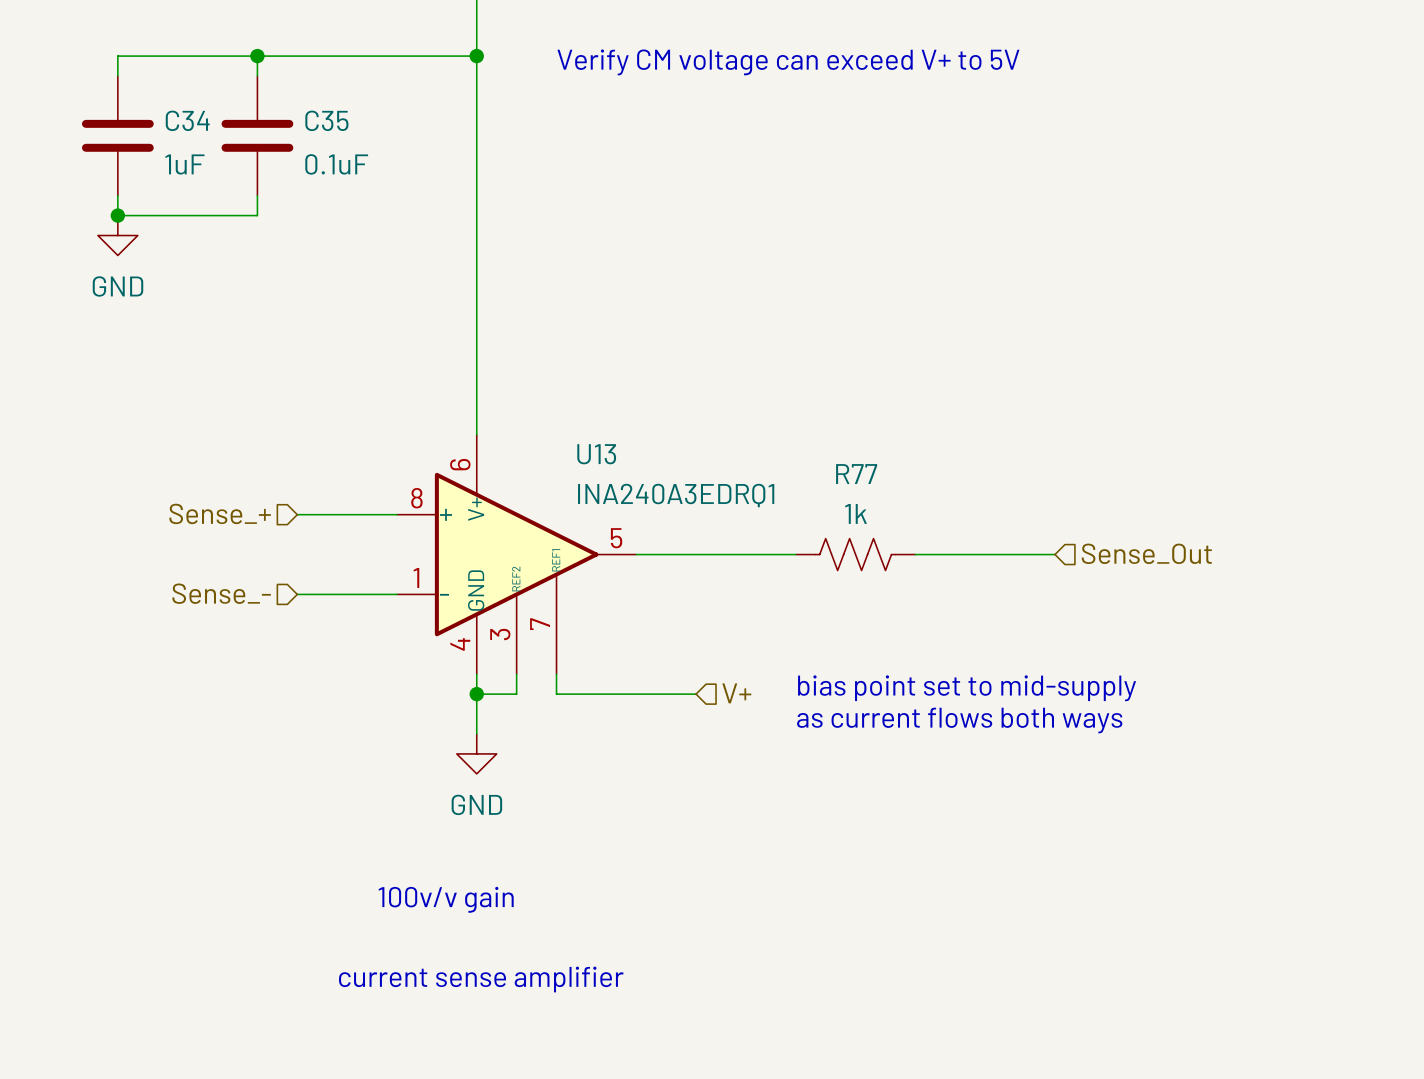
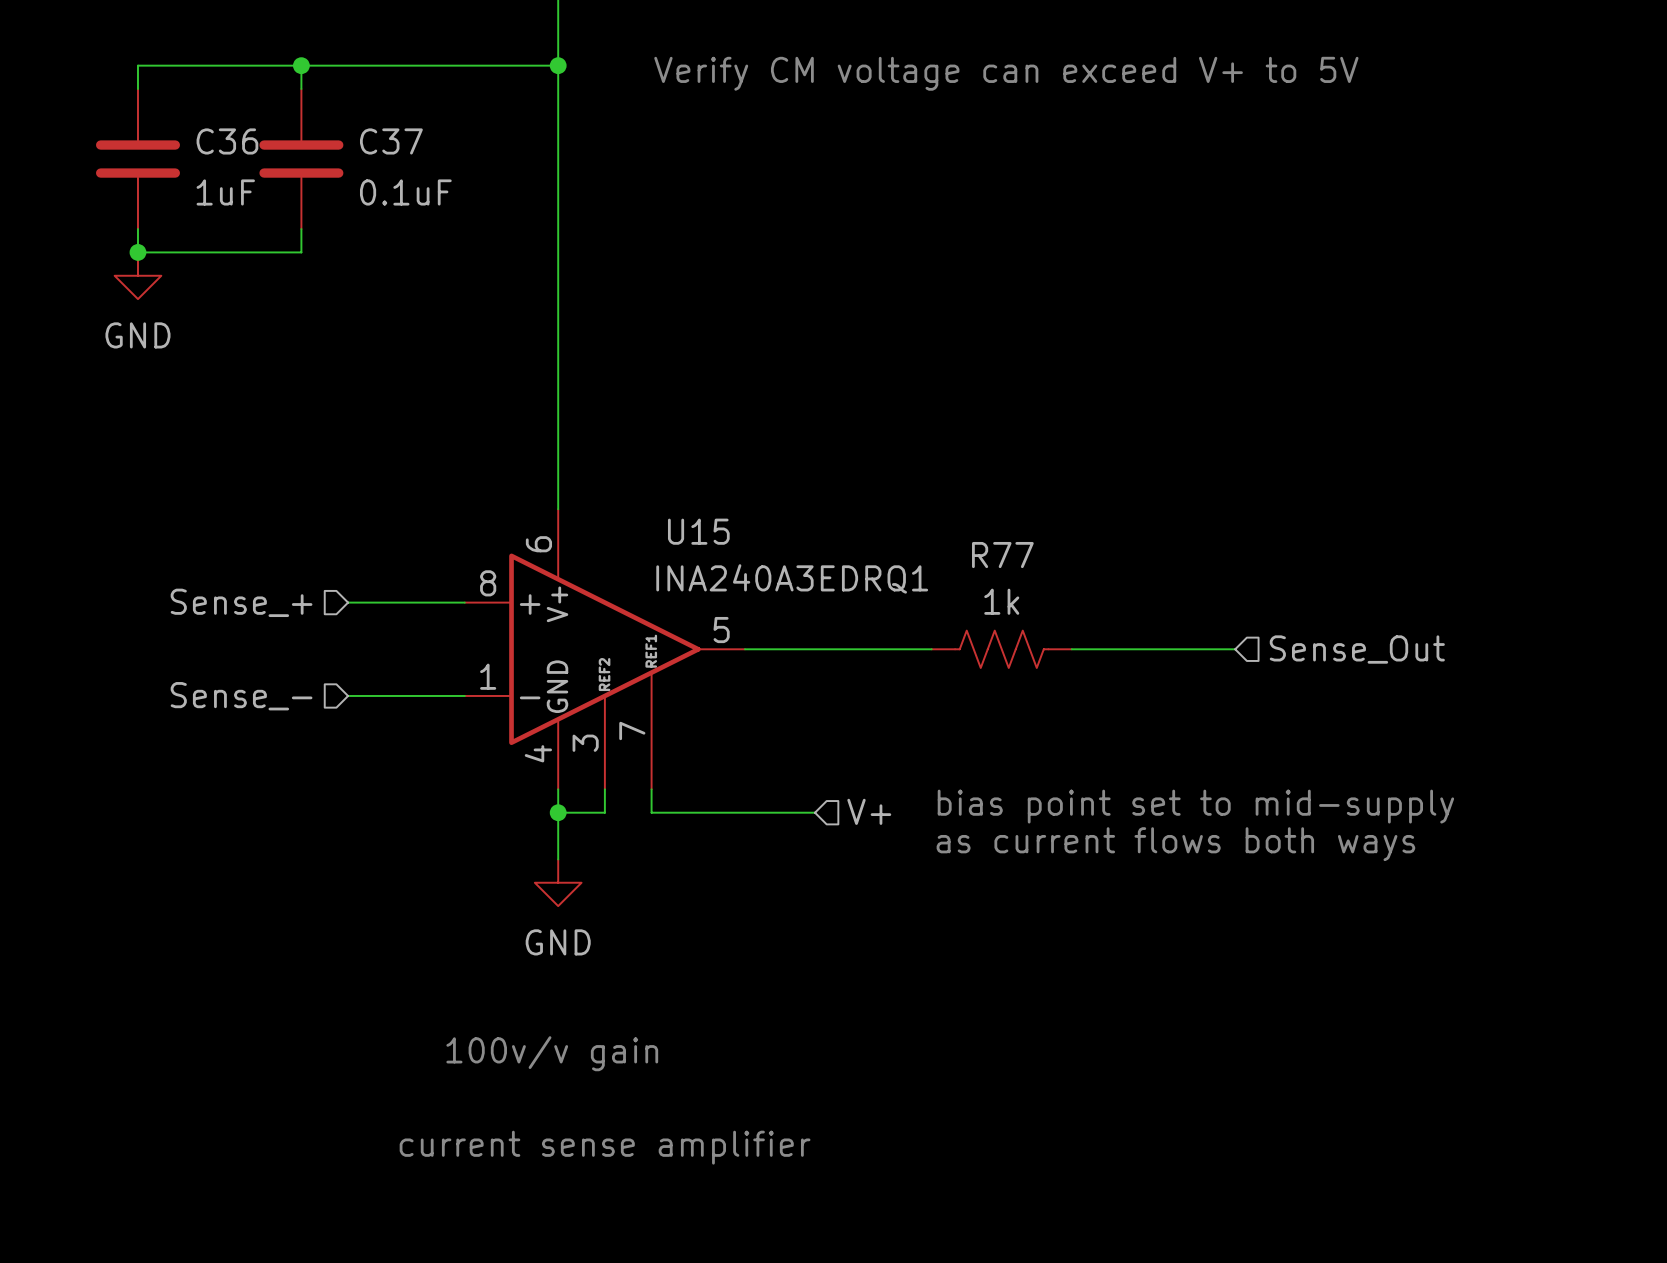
C34 name: C34 (187, 120) -> C36 (227, 141)
C35 name: C35 (326, 120) -> C37 (391, 141)
U13 name: U13 (596, 454) -> U15 (698, 531)

